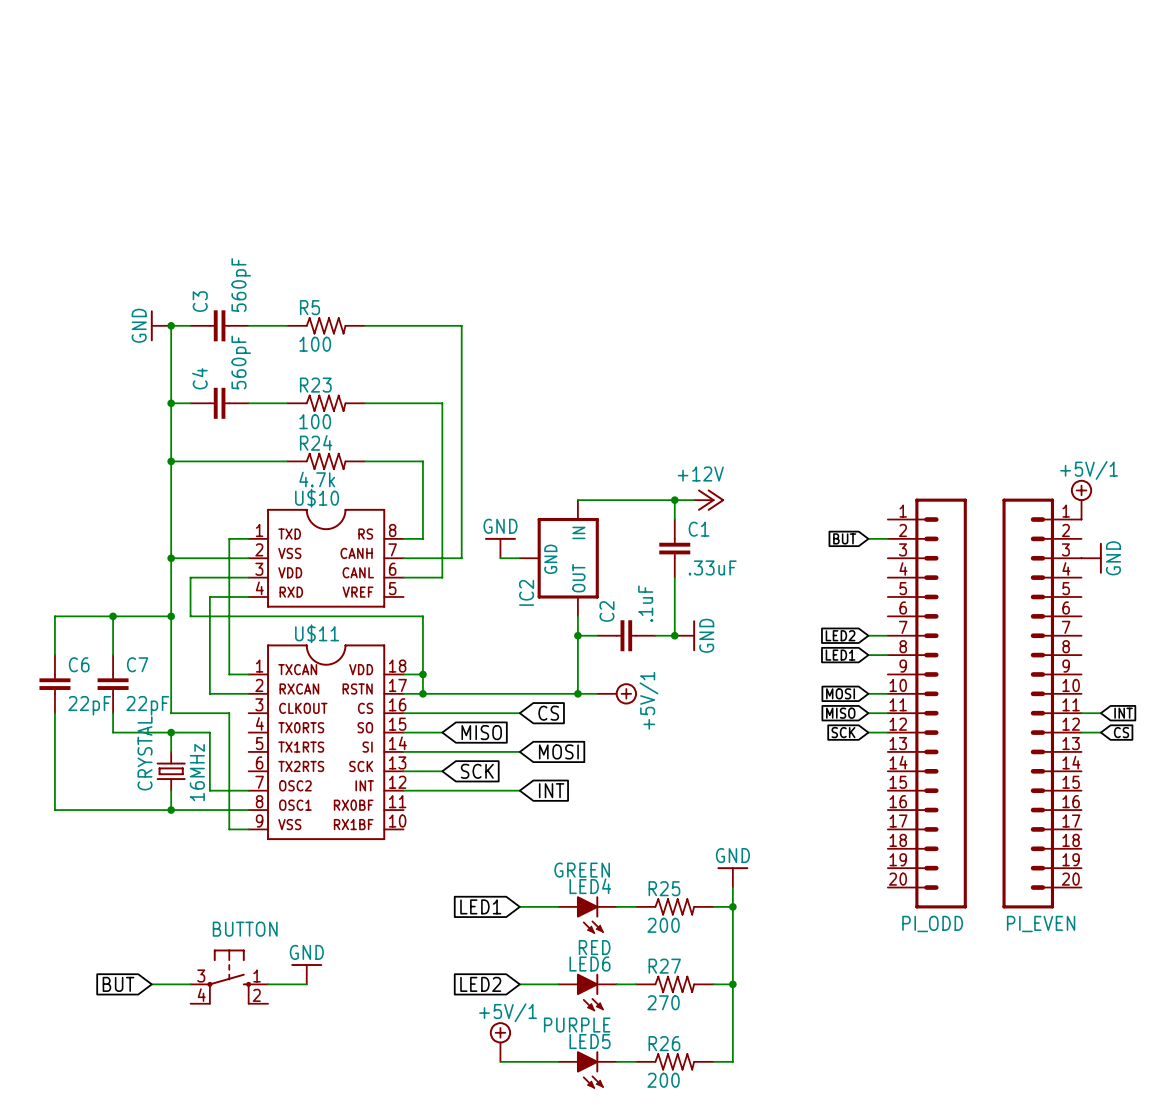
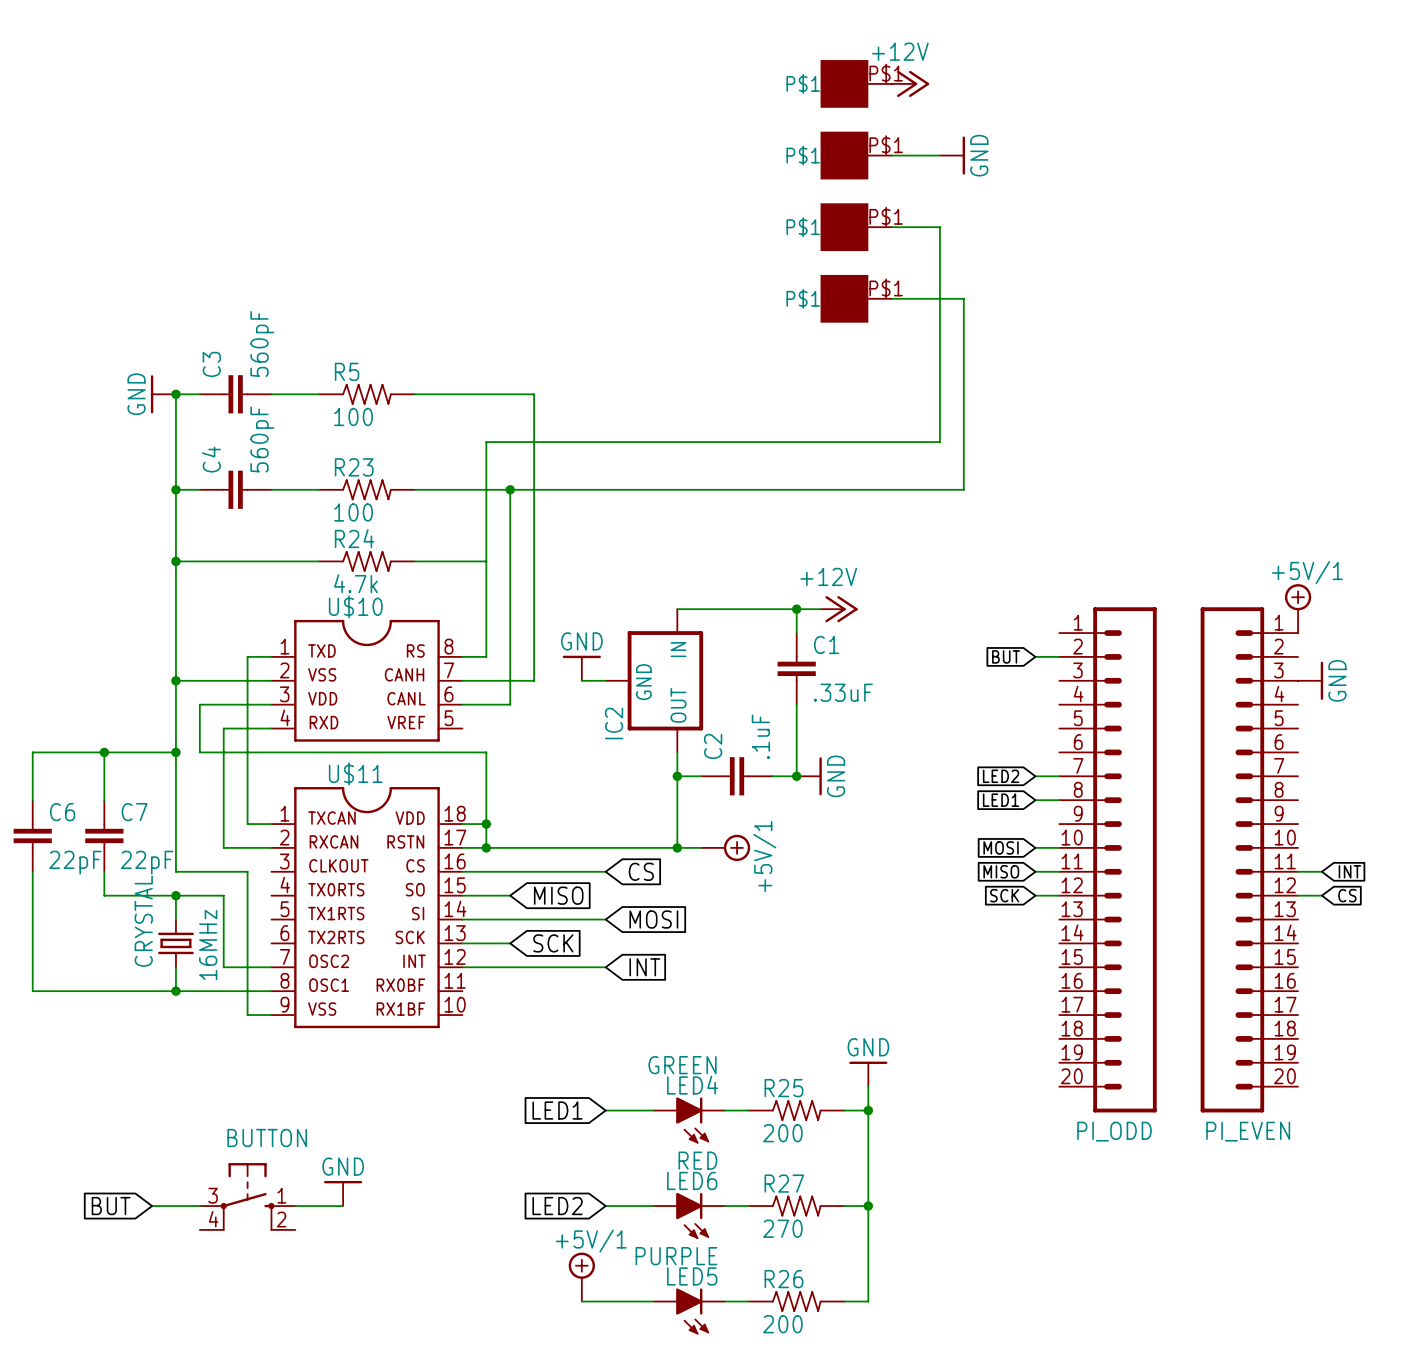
part: none -> (856, 83)
power symbol: none -> +12V (910, 83)
part: none -> (856, 155)
wire: none -> (892, 155) (939, 155)
power symbol: none -> GND (952, 155)
part: none -> (856, 227)
wire: none -> (892, 227) (939, 227) (939, 442) (486, 442) (486, 561)
part: none -> (856, 298)
wire: none -> (892, 298) (963, 298) (963, 489) (510, 489)
junction: none -> (510, 489)

